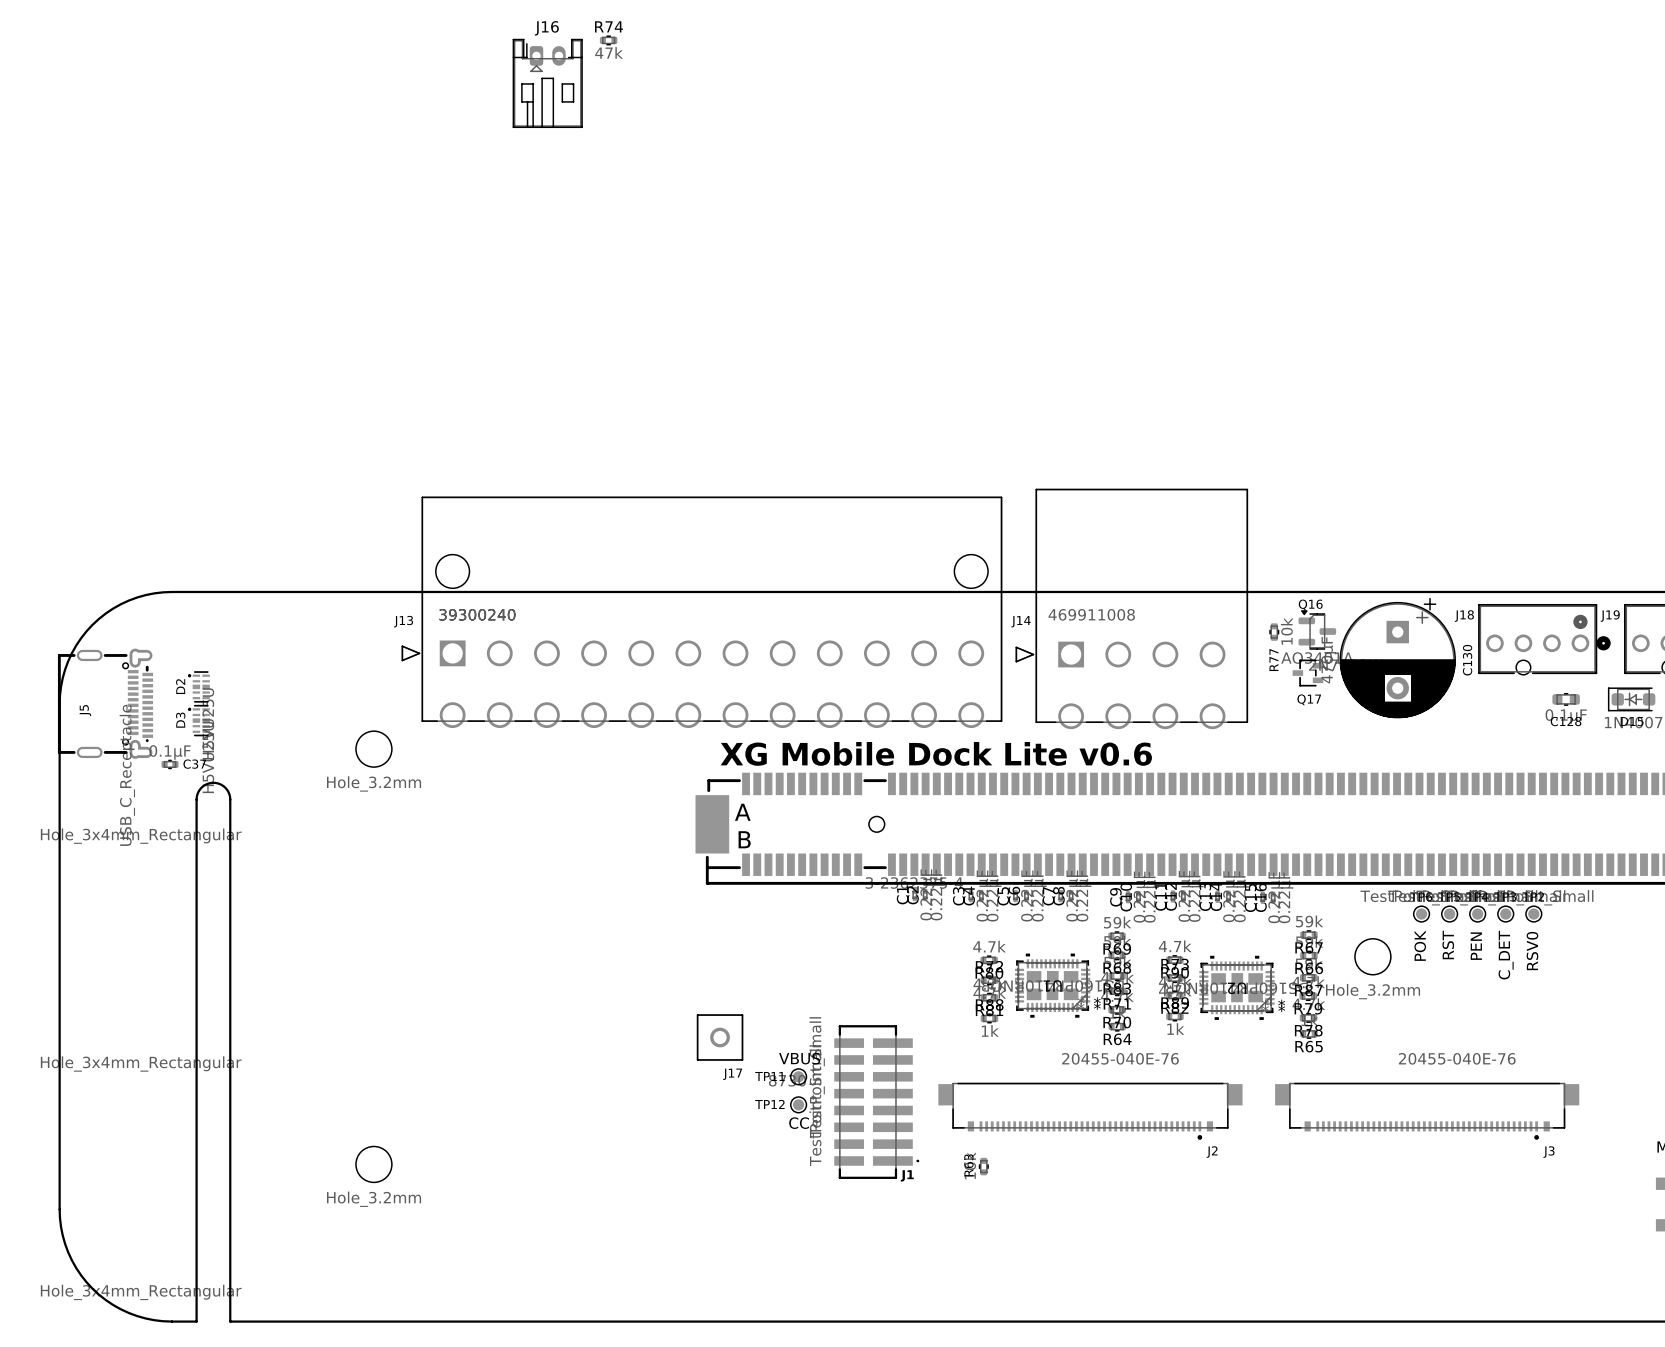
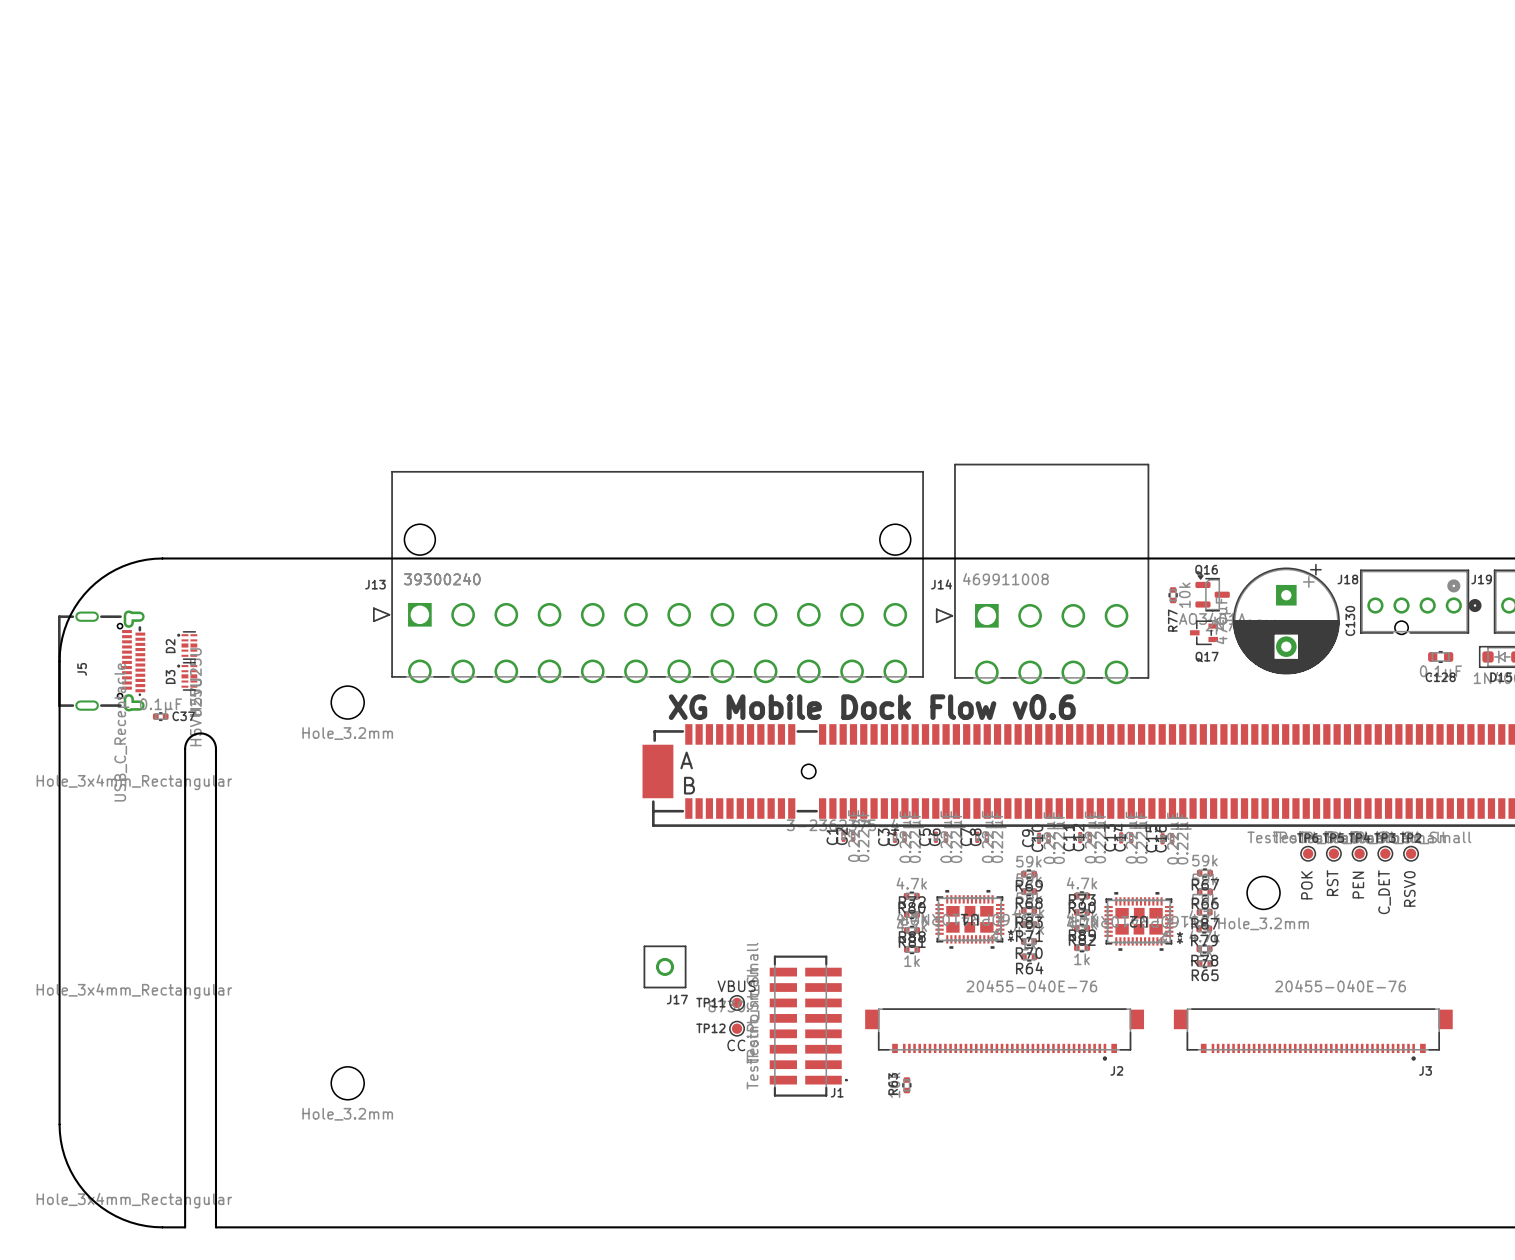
R74: 47k (608, 40) -> none
J16: (547, 83) -> none
text: XG Mobile Dock Lite v0.6 (936, 753) -> XG Mobile Dock Flow v0.6 (872, 707)

